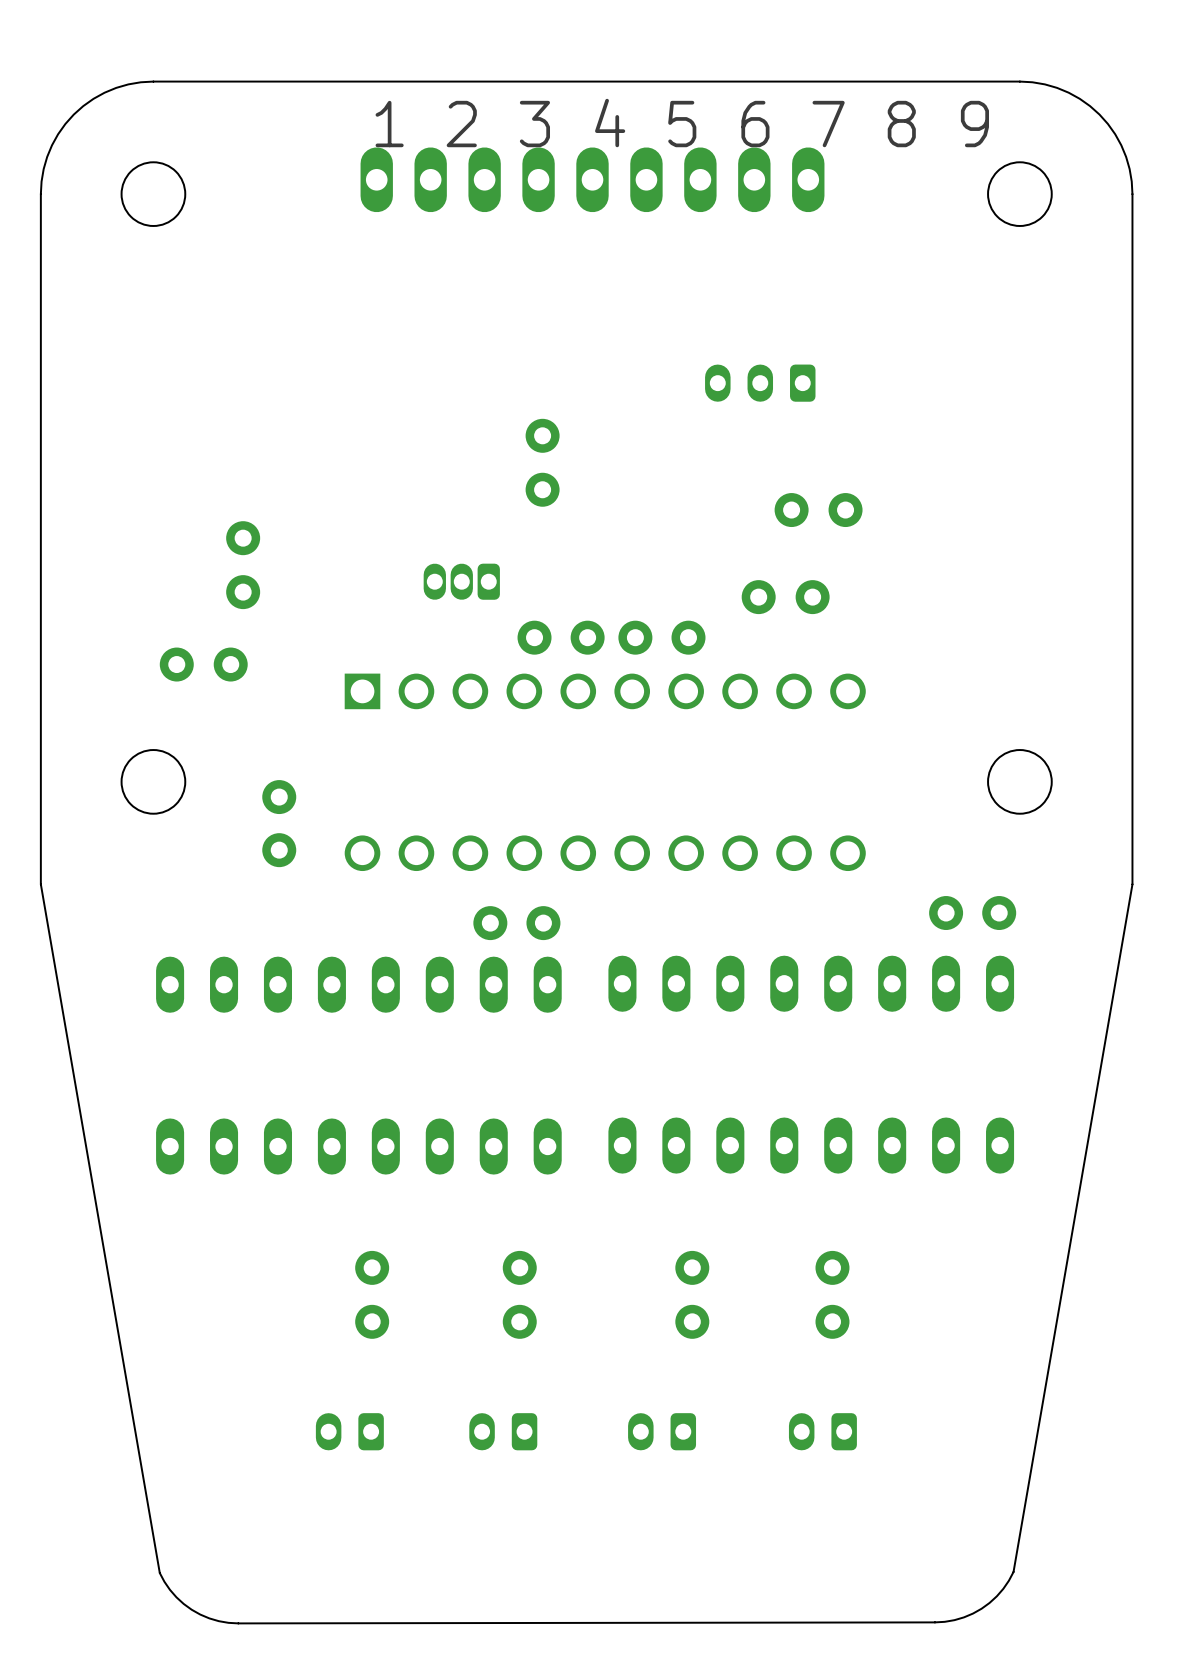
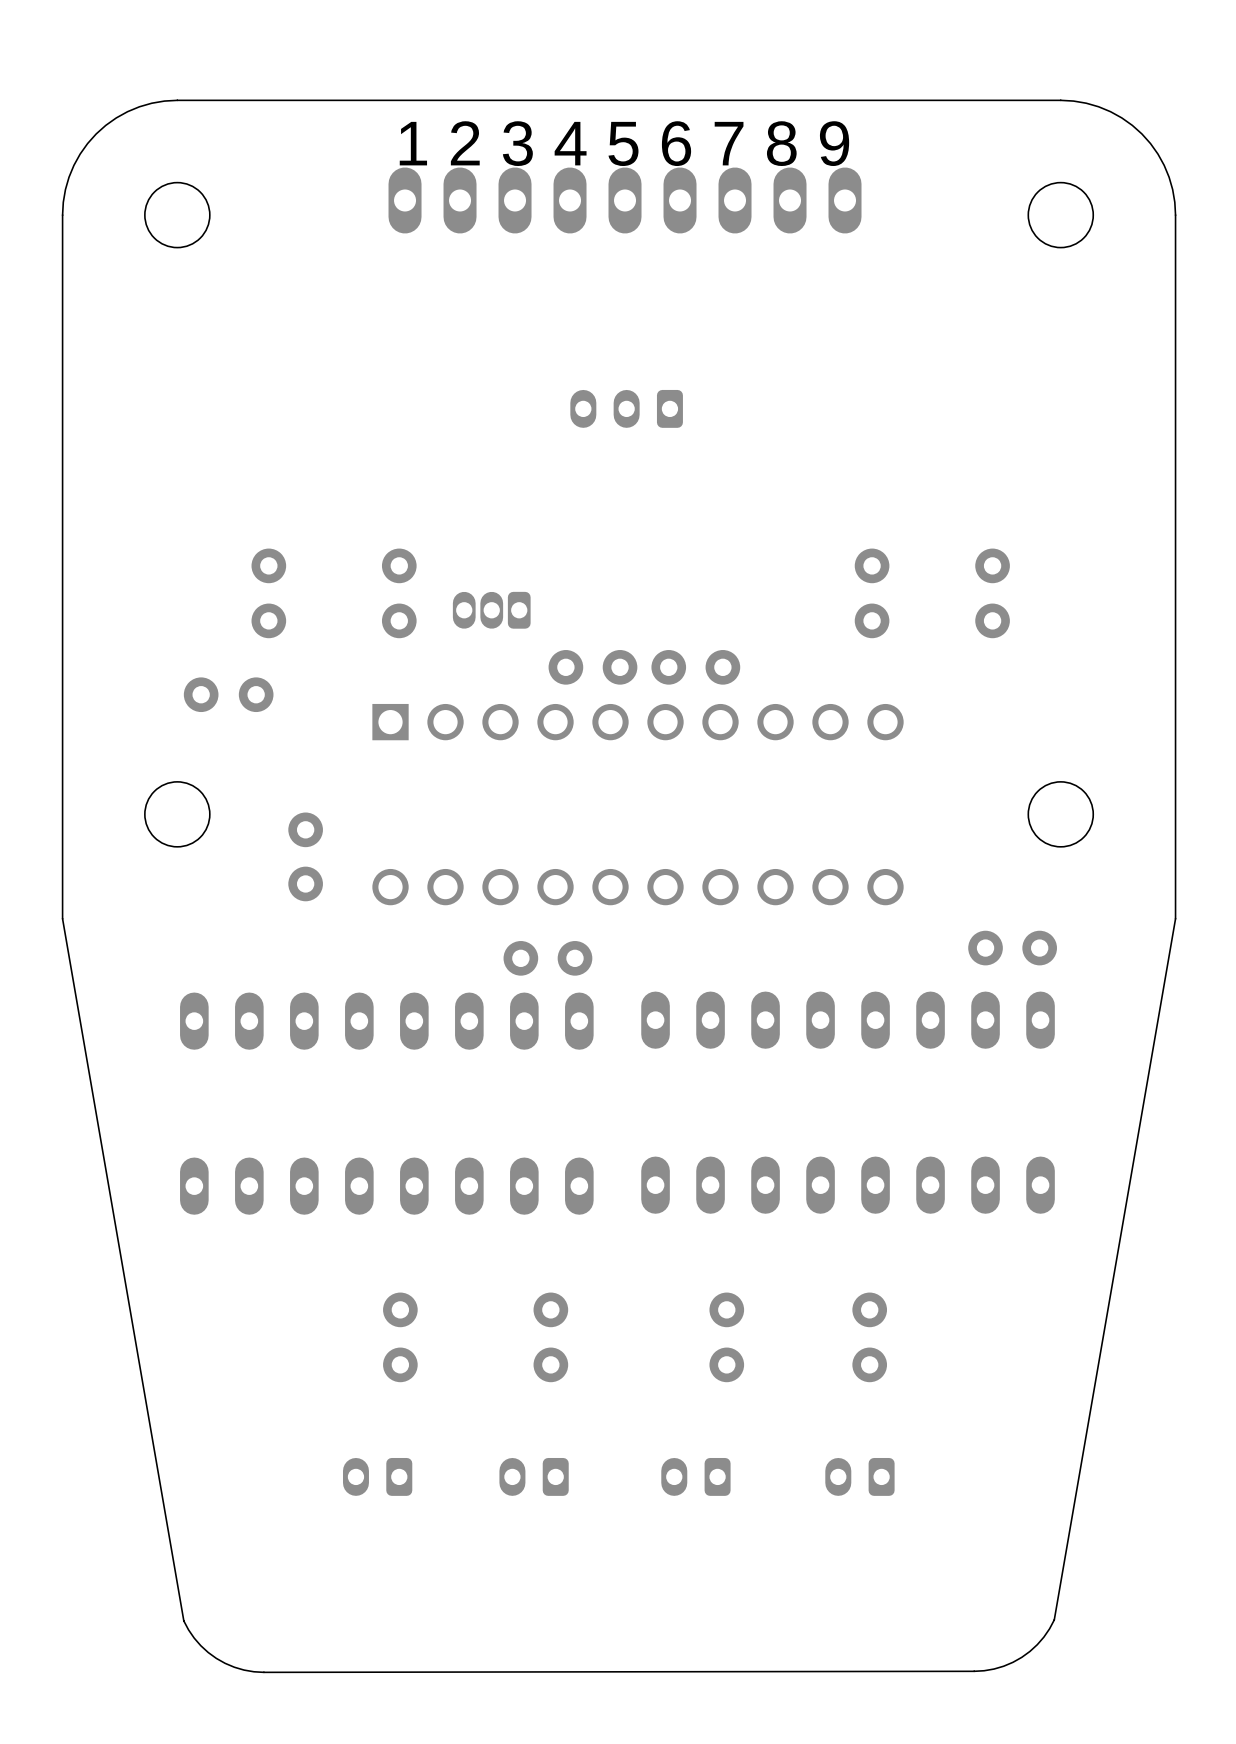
part position: (760, 383) -> (626, 408)
part: (542, 462) -> none
part: (818, 510) -> none
part: none -> (399, 593)
part: none -> (872, 593)
part: none -> (992, 593)
part: (785, 597) -> none

